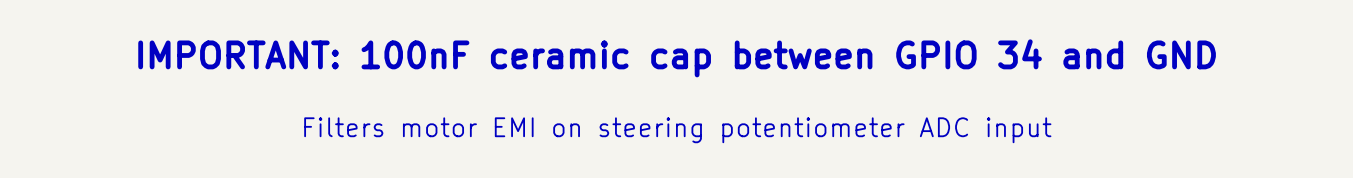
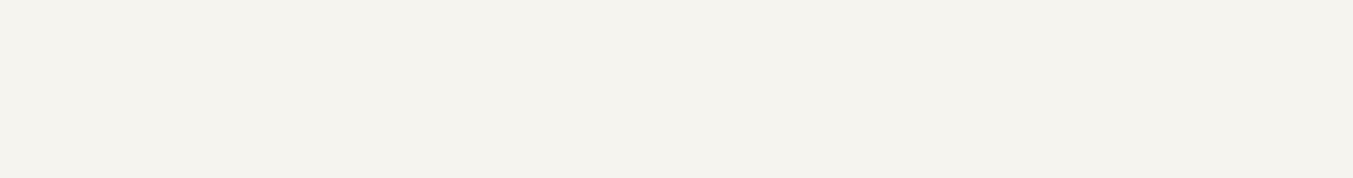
text: IMPORTANT: 100nF ceramic cap between GPIO 34 and GND (677, 58) -> none
text: Filters motor EMI on steering potentiometer ADC input (677, 130) -> none

